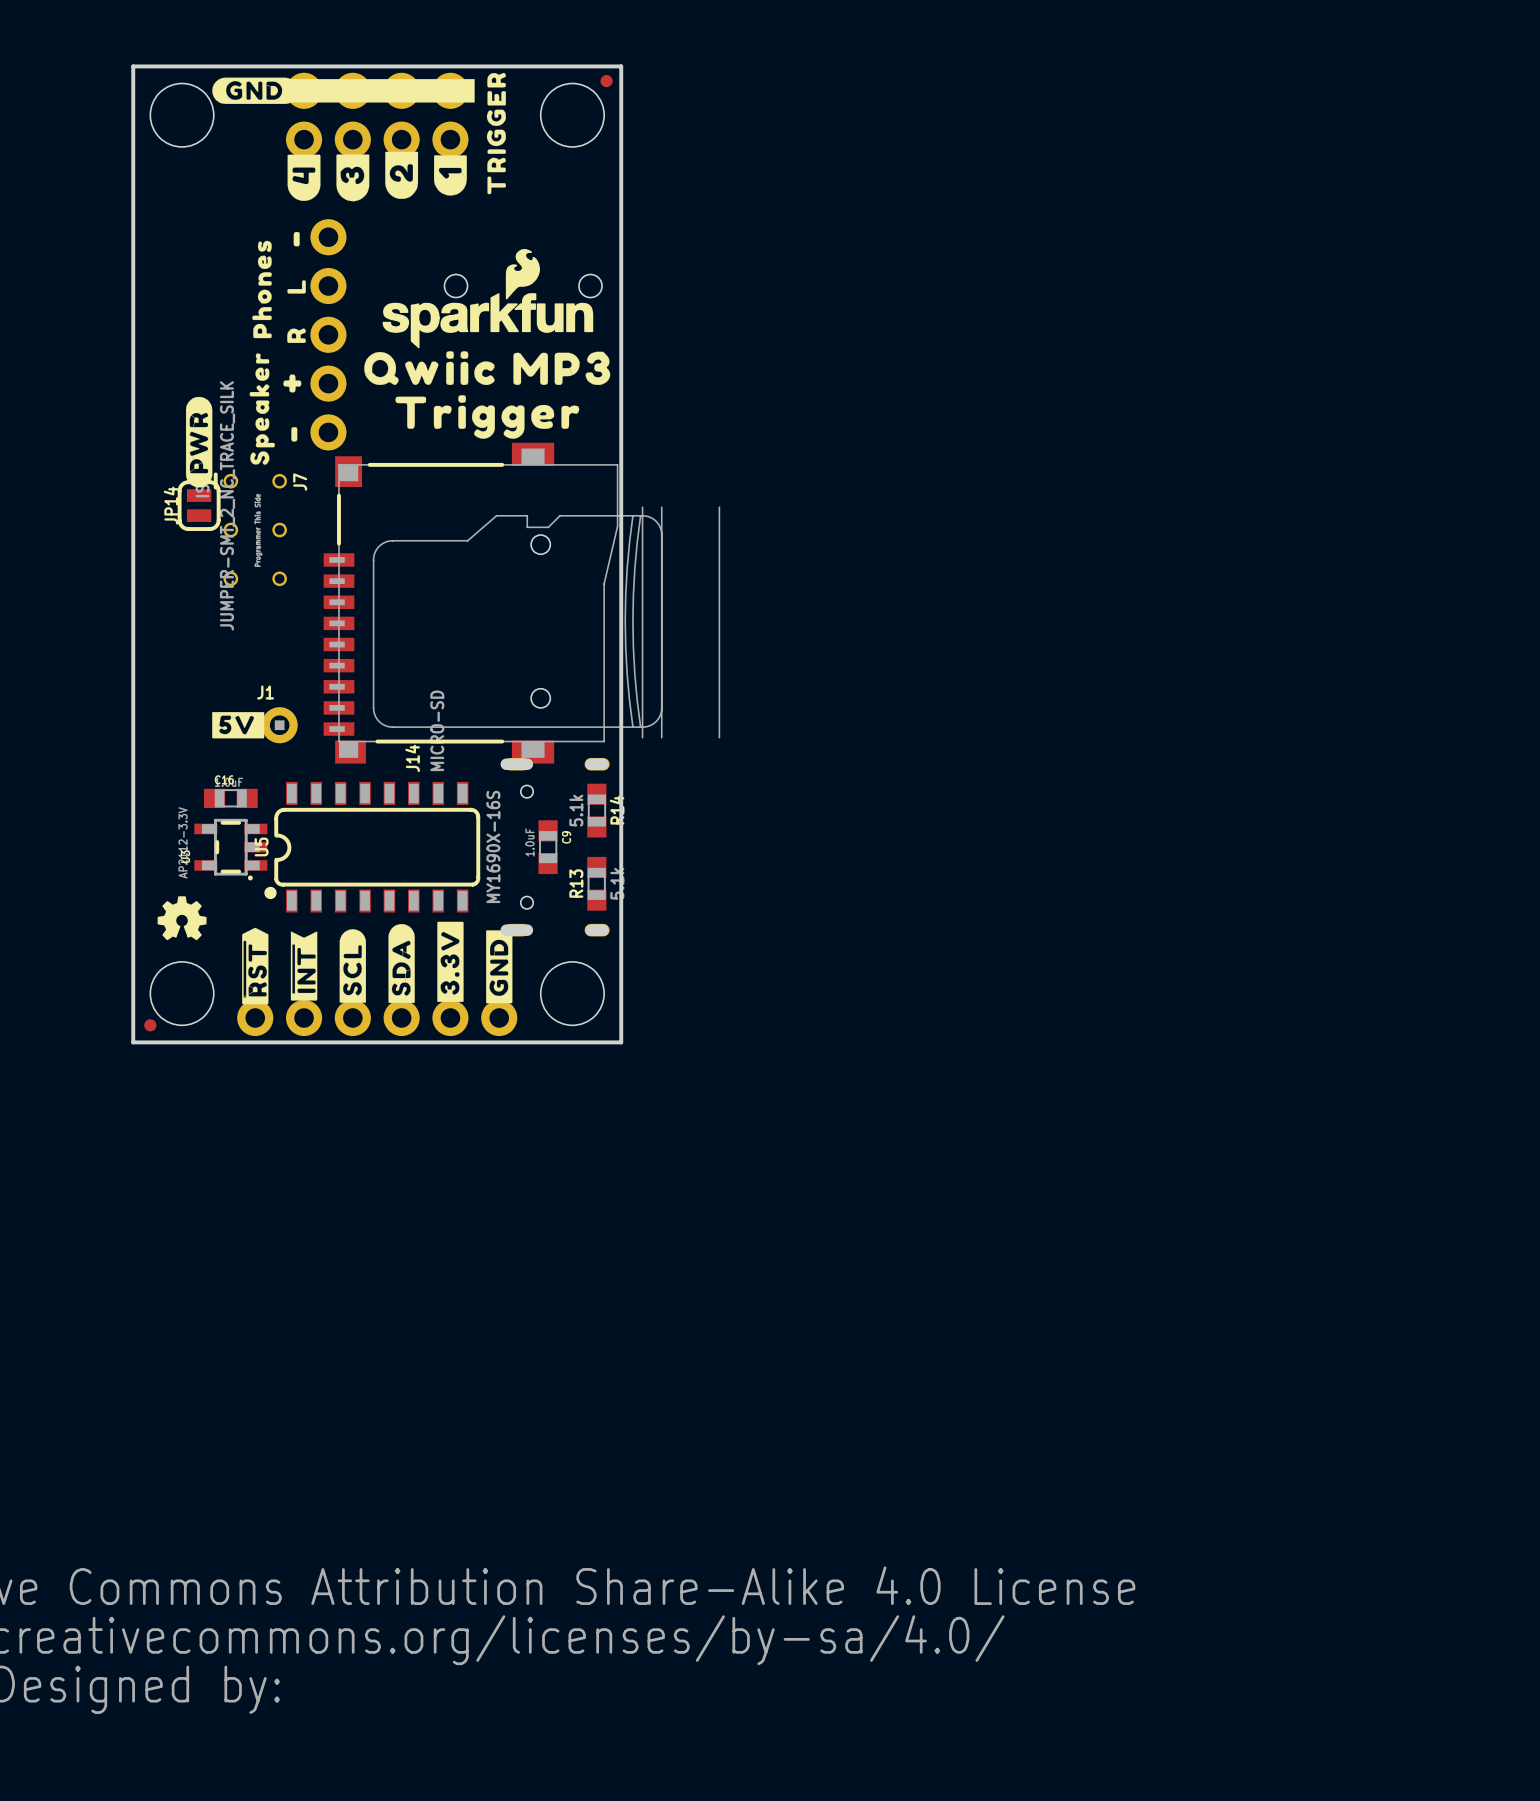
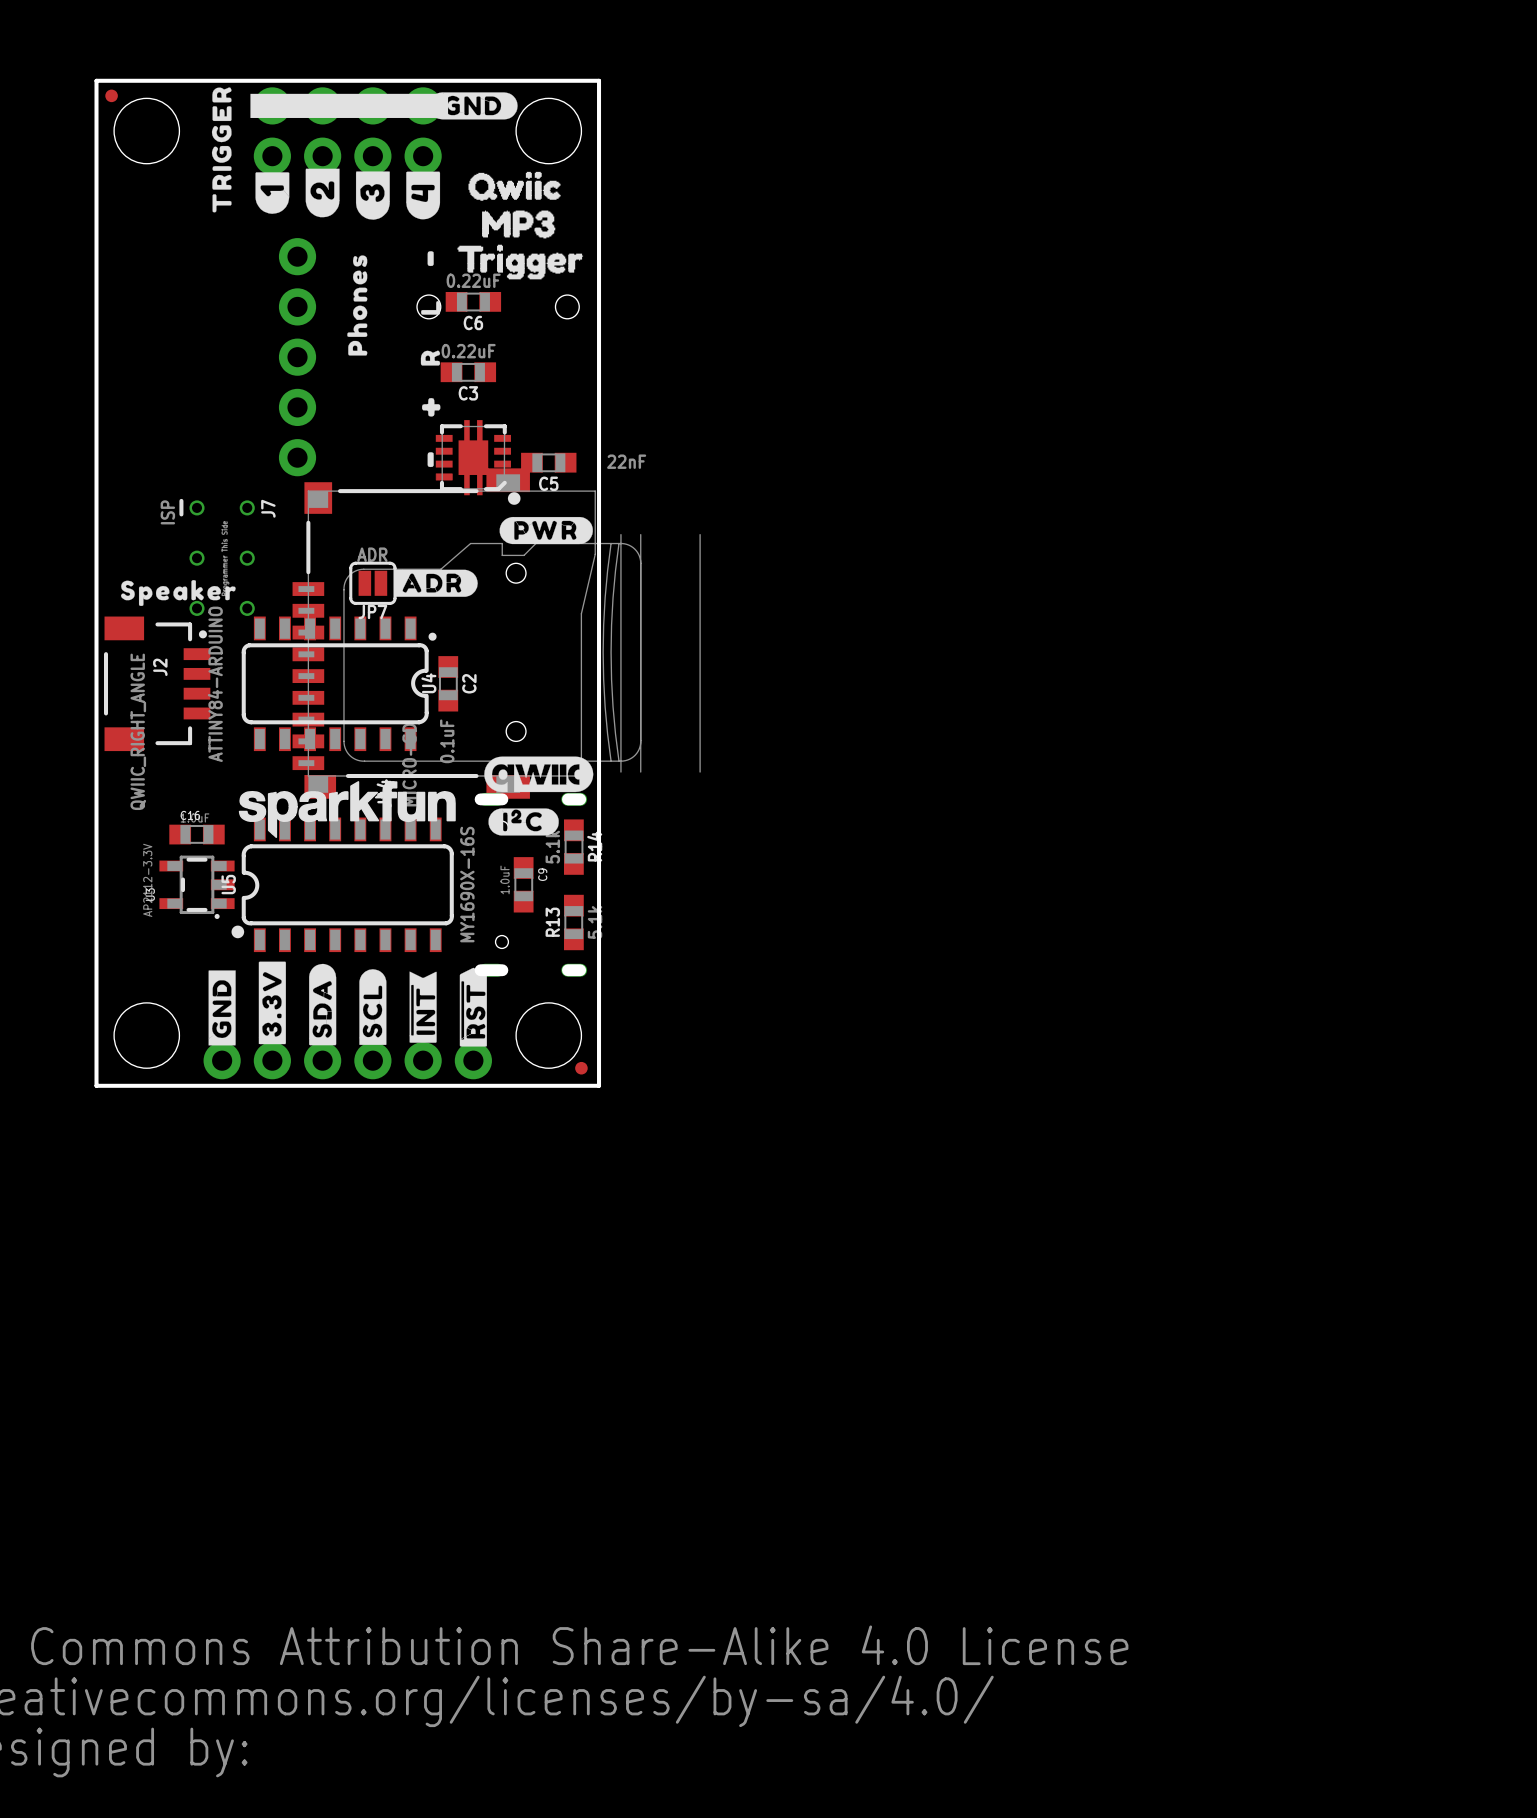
part position: (606, 81) -> (111, 95)
drawing position: (255, 90) -> (473, 105)
drawing position: (496, 133) -> (221, 149)
drawing: none -> [427, 171, 584, 280]
drawing position: (401, 175) -> (322, 192)
drawing position: (450, 175) -> (272, 193)
drawing position: (304, 177) -> (423, 195)
drawing position: (352, 177) -> (372, 195)
drawing: [293, 231, 300, 247] -> none
drawing: [364, 249, 611, 439] -> none
C6: none -> 0.22uF (473, 301)
drawing position: (296, 286) -> (430, 307)
drawing position: (261, 289) -> (357, 305)
drawing position: (296, 335) -> (430, 358)
C3: none -> 0.22uF (468, 372)
drawing: [249, 353, 298, 465] -> none
drawing position: (292, 383) -> (431, 407)
drawing: [185, 396, 213, 488] -> none
drawing: none -> [427, 452, 434, 468]
part: none -> (478, 462)
C5: none -> 22nF (548, 462)
drawing: none -> [499, 516, 593, 545]
JP14: JUMPER-SMT_2_NC_TRACE_SILK (199, 505) -> none
drawing: none -> [395, 569, 478, 597]
drawing: none -> [120, 580, 236, 606]
JP7: none -> ADR (372, 583)
J2: none -> QWIIC_RIGHT_ANGLE (157, 683)
U4: none -> ATTINY84-ARDUINO (339, 683)
C2: none -> 0.1uF (448, 683)
drawing: [212, 712, 265, 739] -> none
drawing: none -> [484, 756, 594, 836]
J1: (279, 725) -> none
drawing: none -> [238, 781, 456, 838]
drawing: [157, 896, 207, 941] -> none
drawing position: (450, 961) -> (272, 1002)
drawing position: (401, 963) -> (322, 1004)
drawing position: (352, 965) -> (372, 1007)
drawing position: (255, 966) -> (473, 1007)
drawing position: (304, 966) -> (423, 1007)
drawing position: (499, 966) -> (222, 1007)
part position: (150, 1025) -> (581, 1068)

